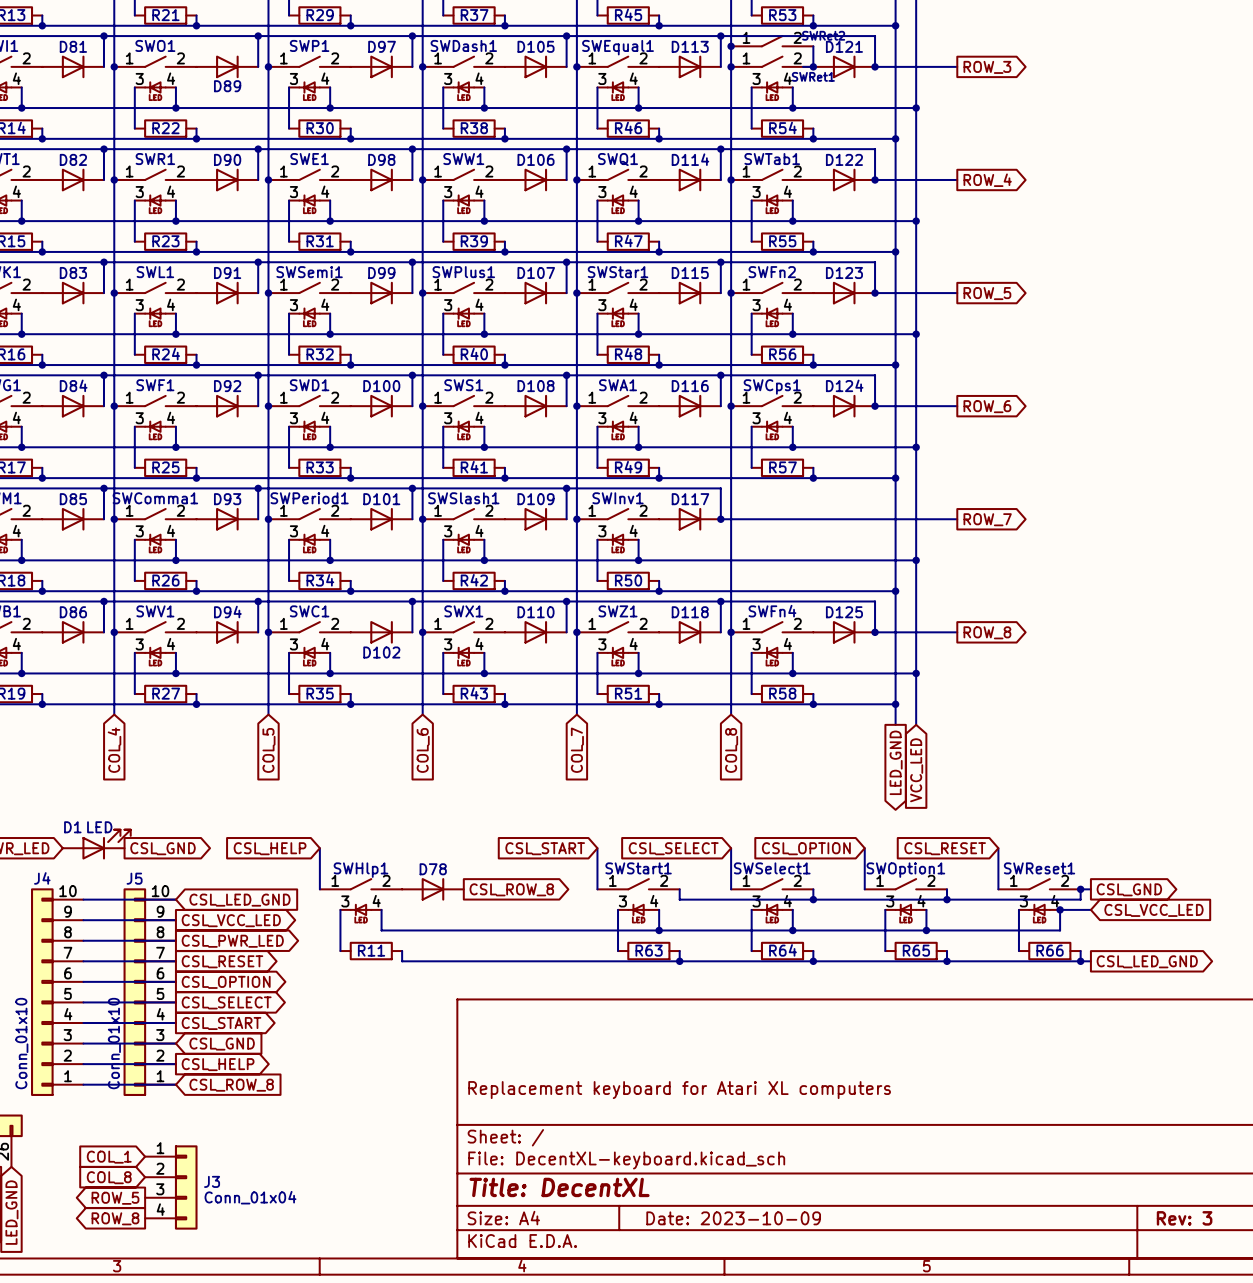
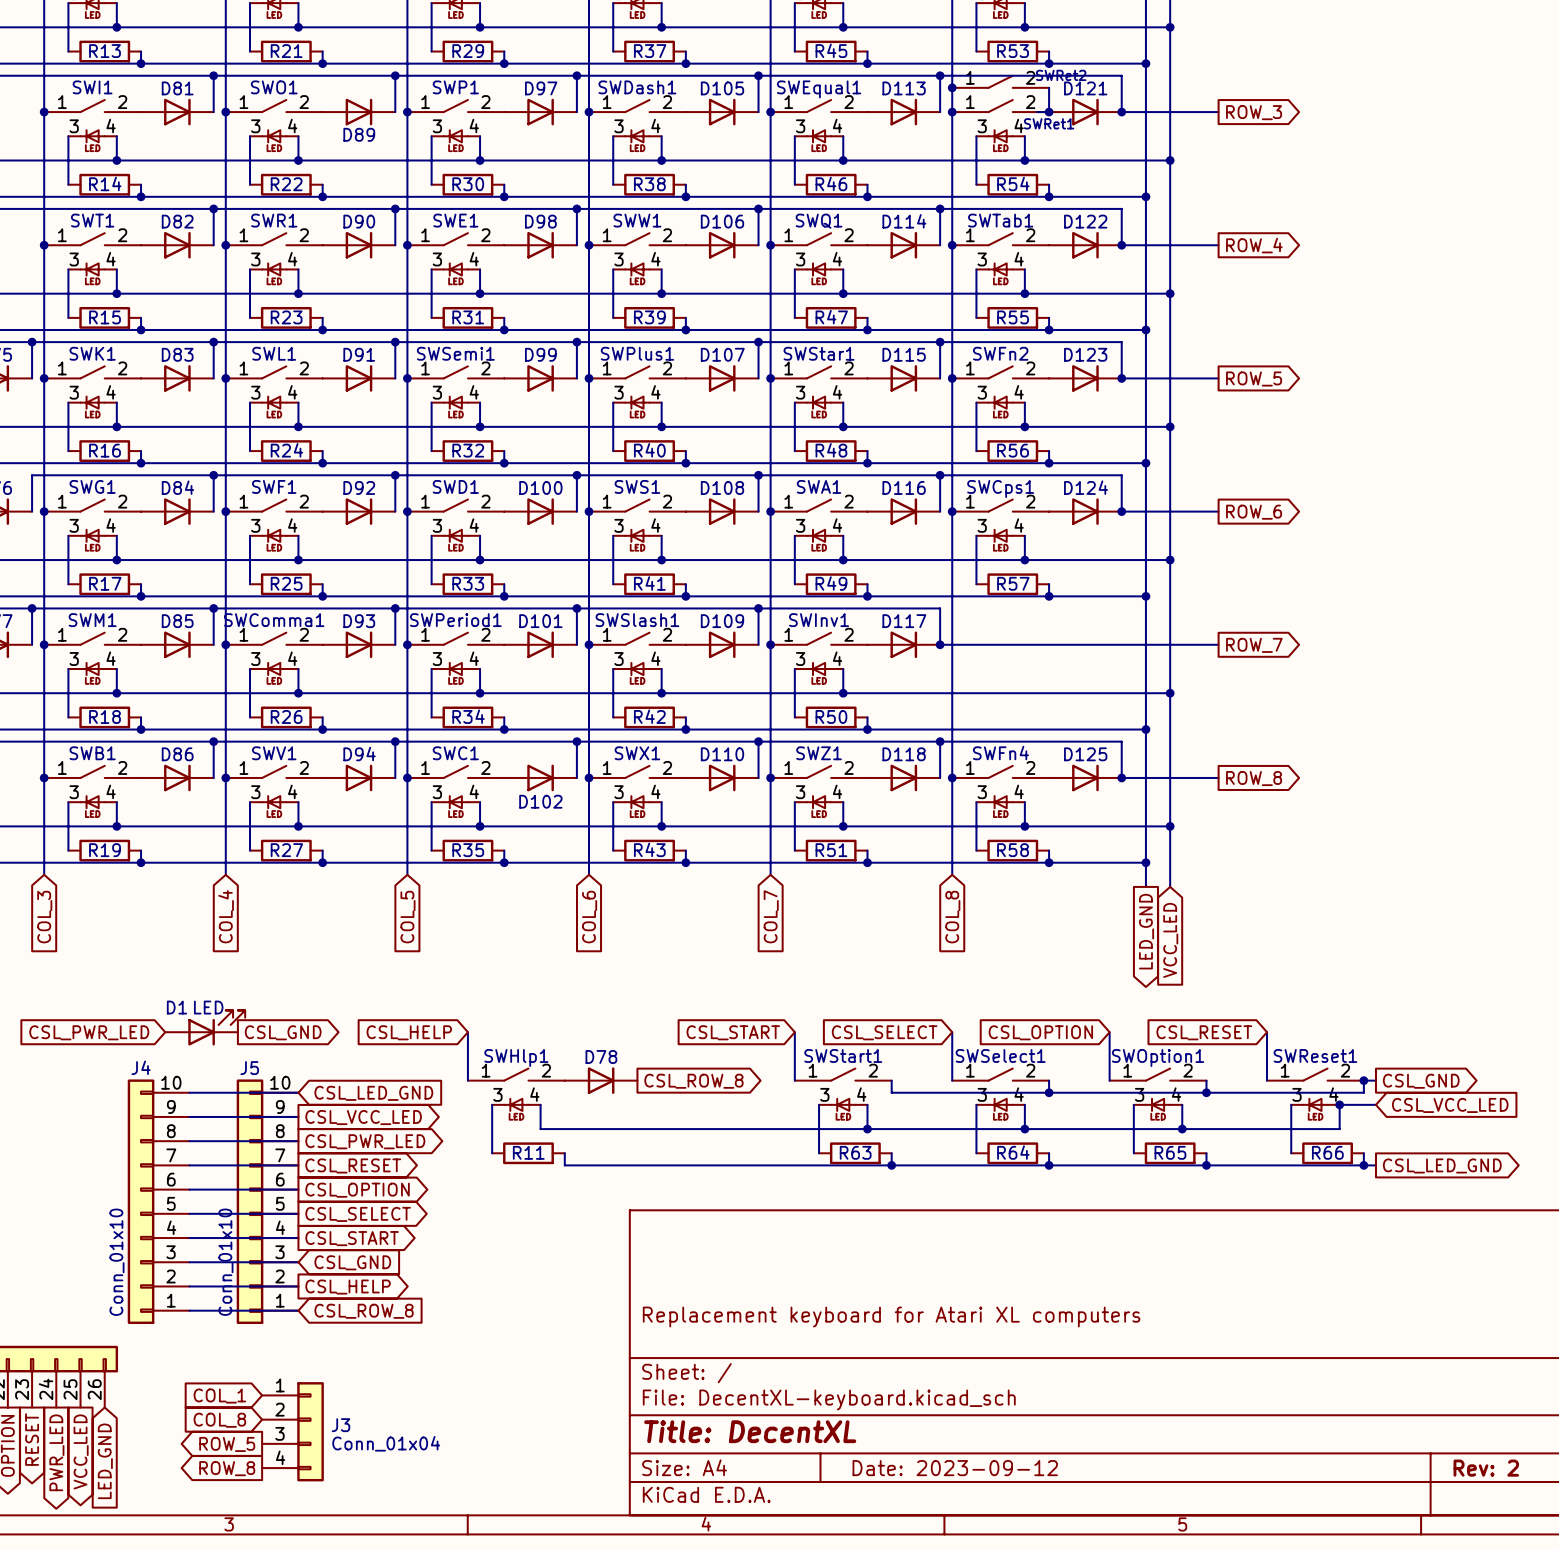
title block: Date: 2023-10-09 (733, 1218) -> Date: 2023-09-12 (955, 1468)
title block: Rev: 3 (1184, 1218) -> Rev: 2 (1486, 1468)

